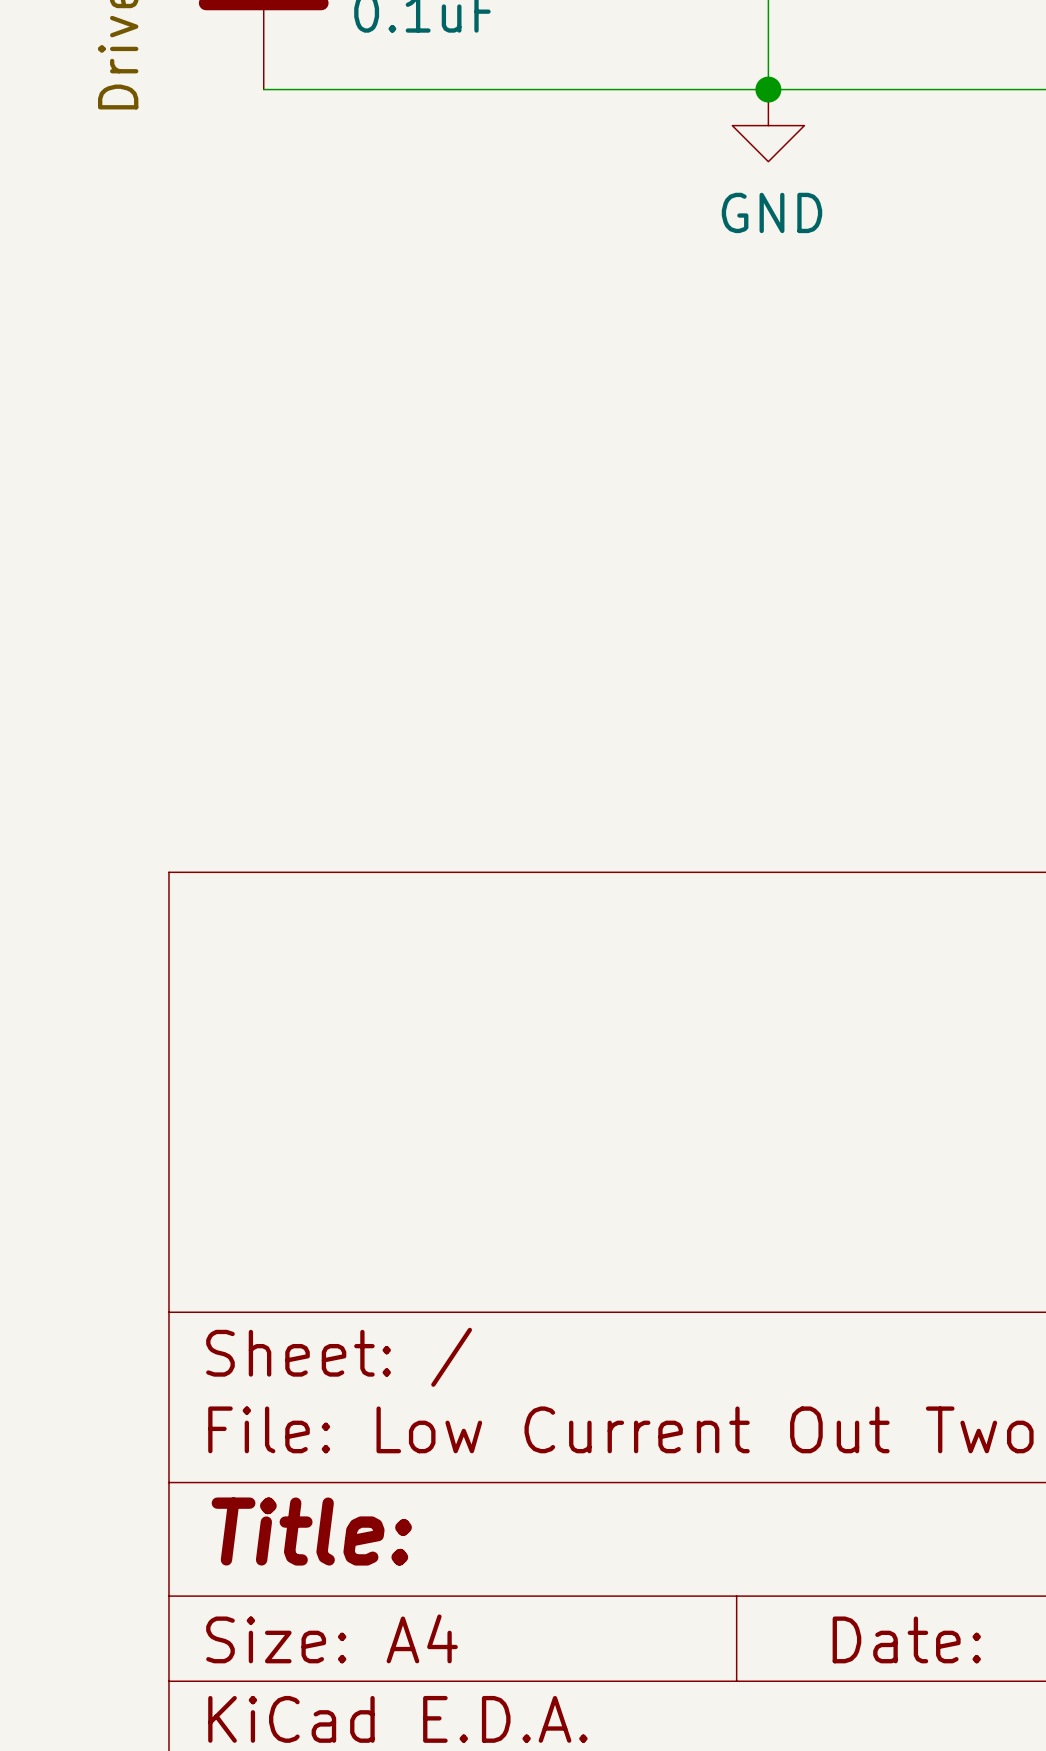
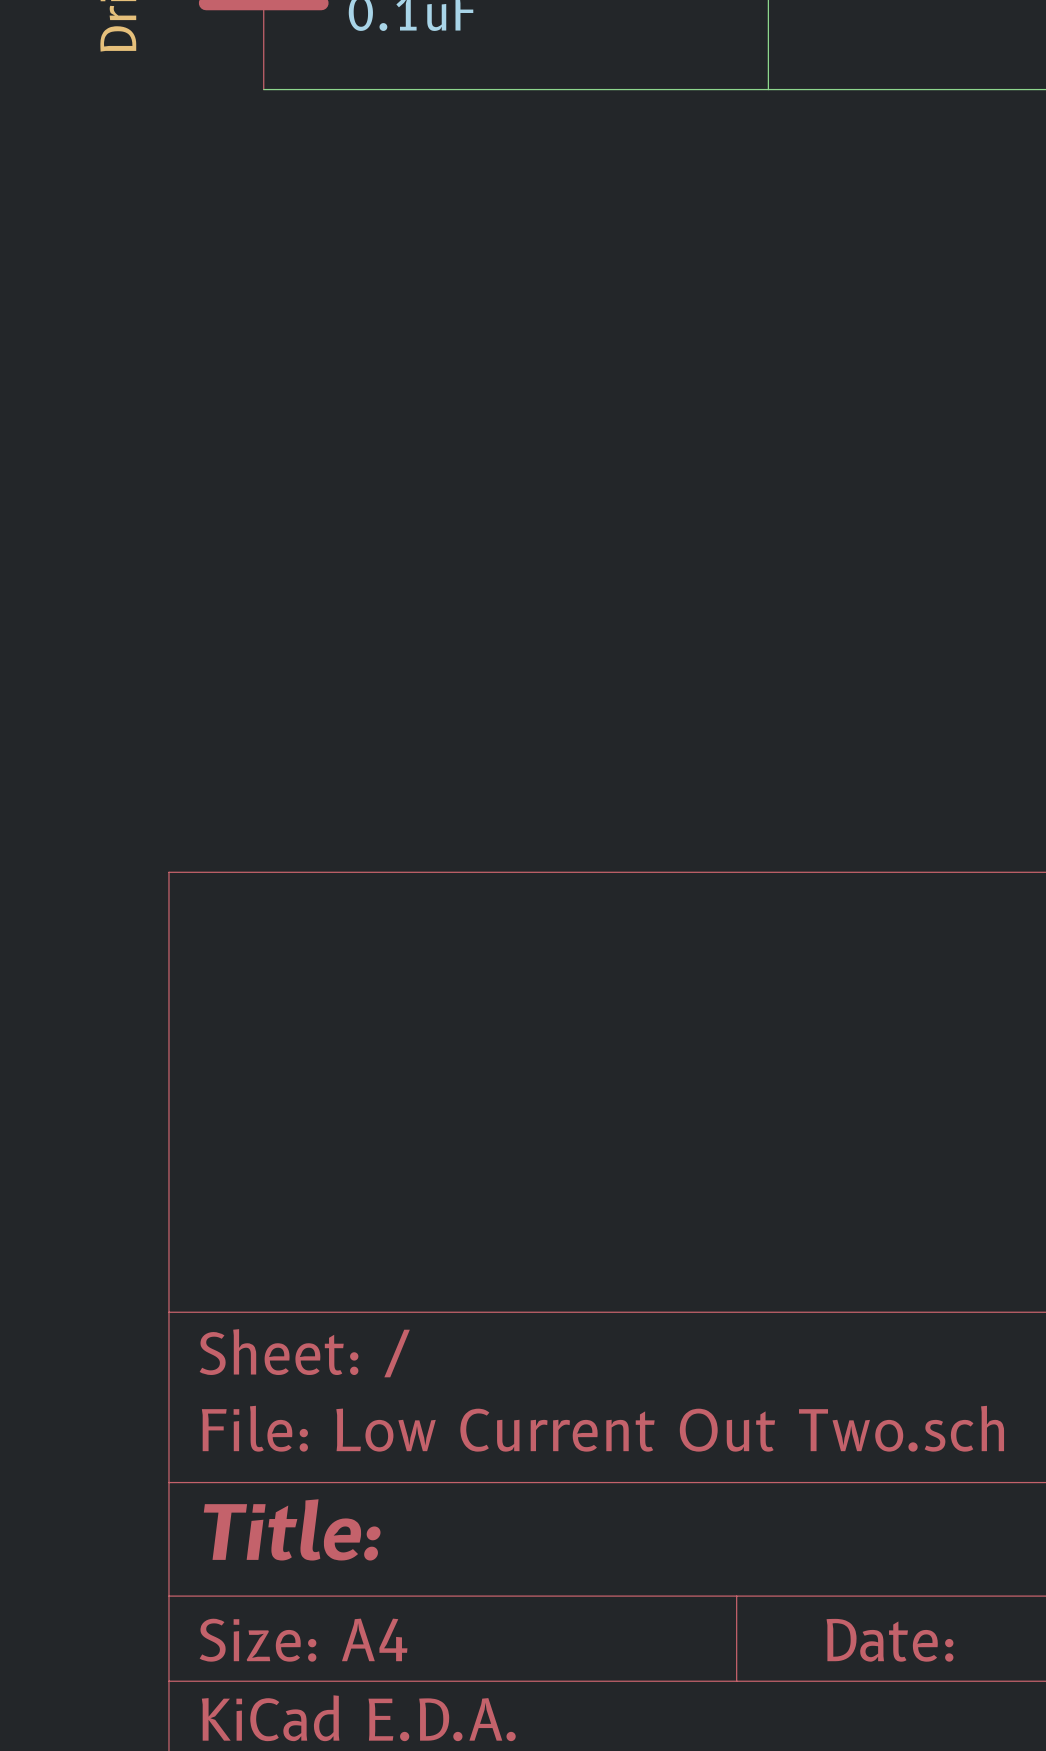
junction: (768, 89) -> none
power symbol: GND (768, 125) -> none

